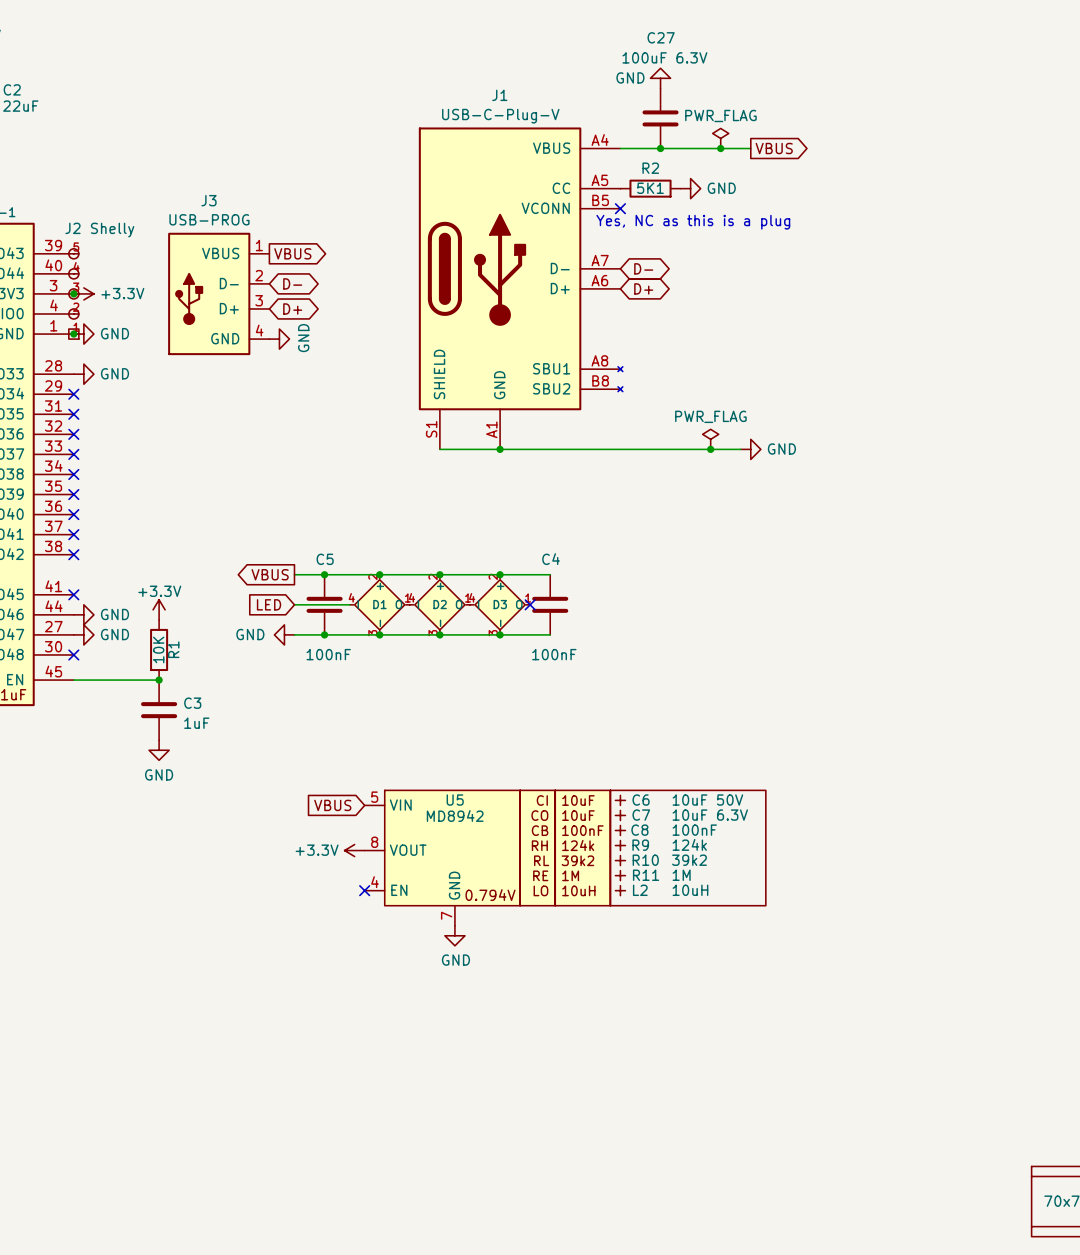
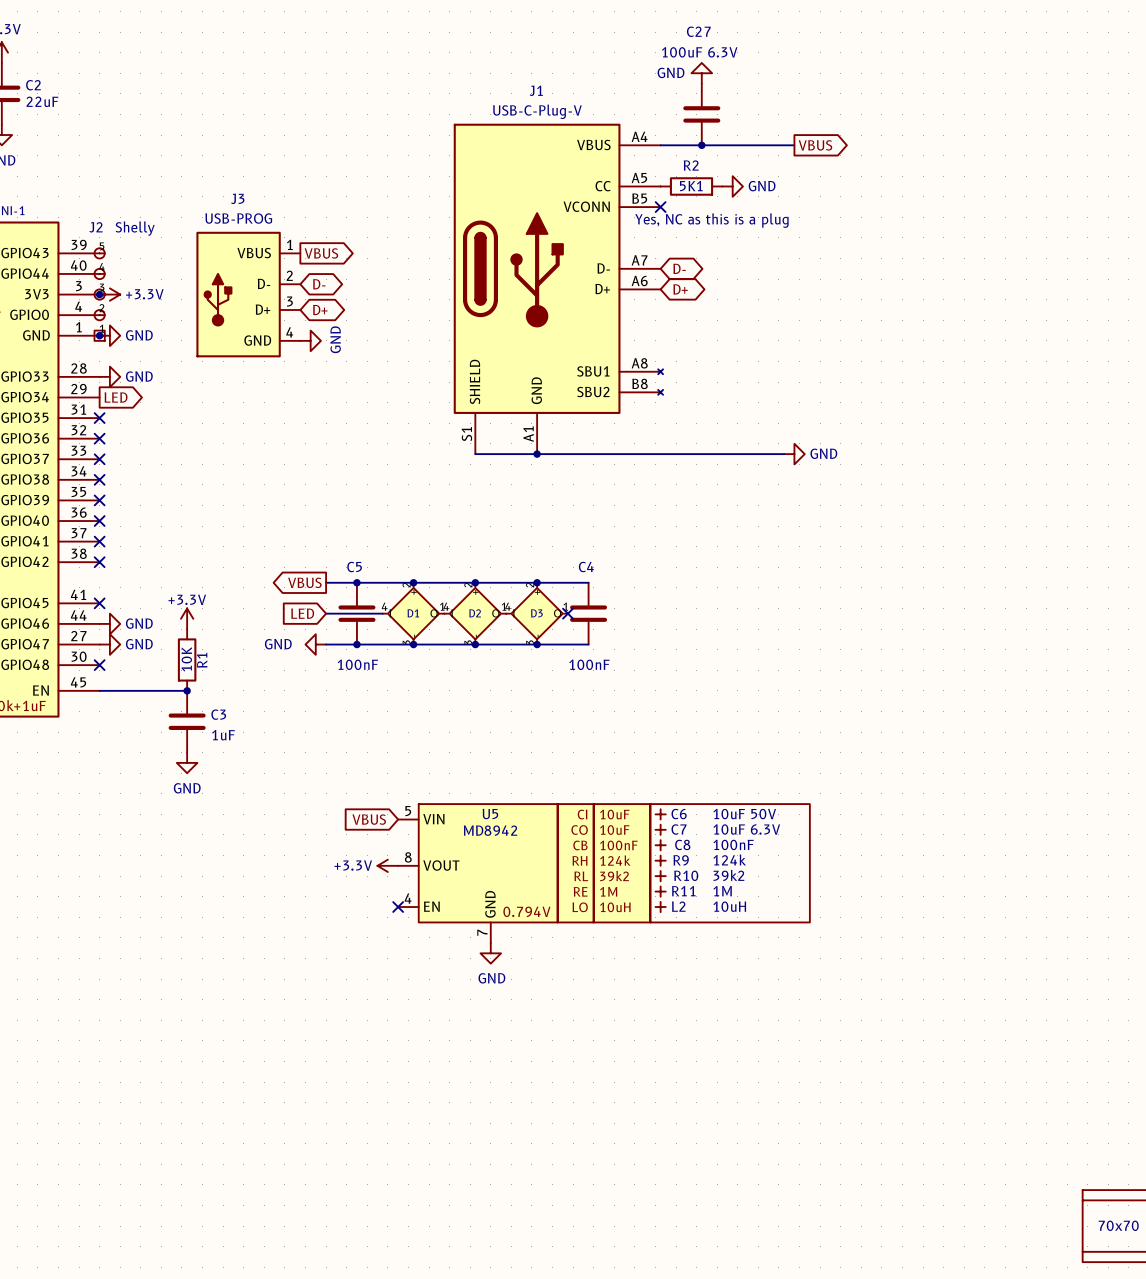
power symbol: PWR_FLAG (720, 138) -> none
junction: (720, 148) -> none
no-connect mark: (73, 394) -> none
global label: none -> LED (116, 397)
power symbol: PWR_FLAG (710, 439) -> none
junction: (710, 449) -> none

